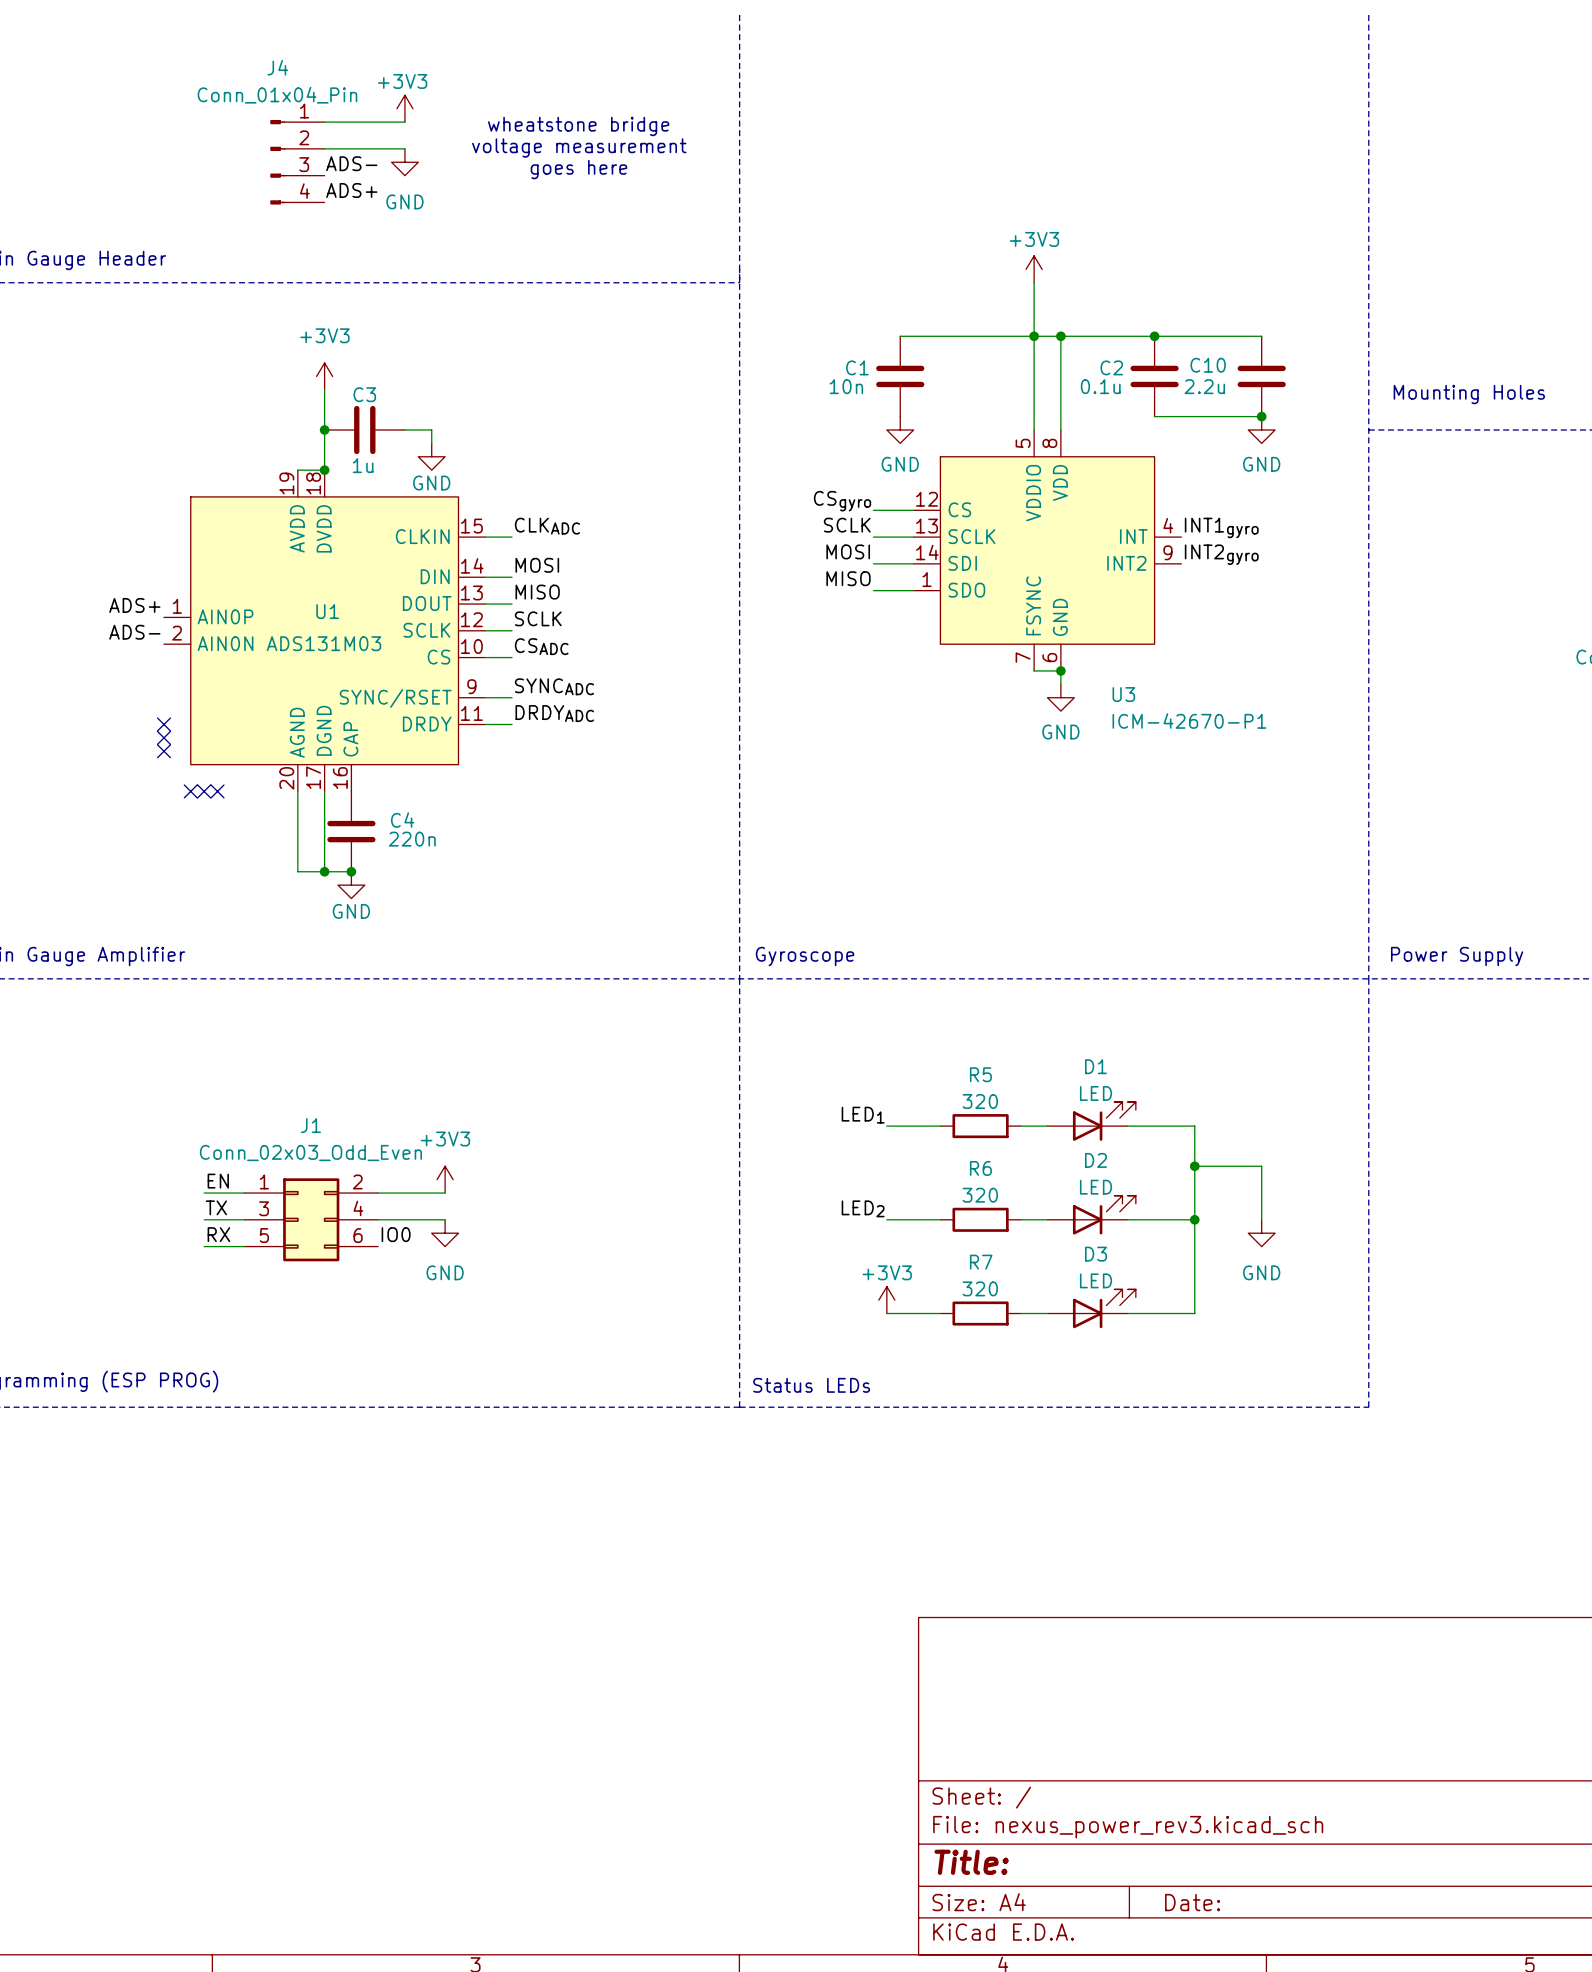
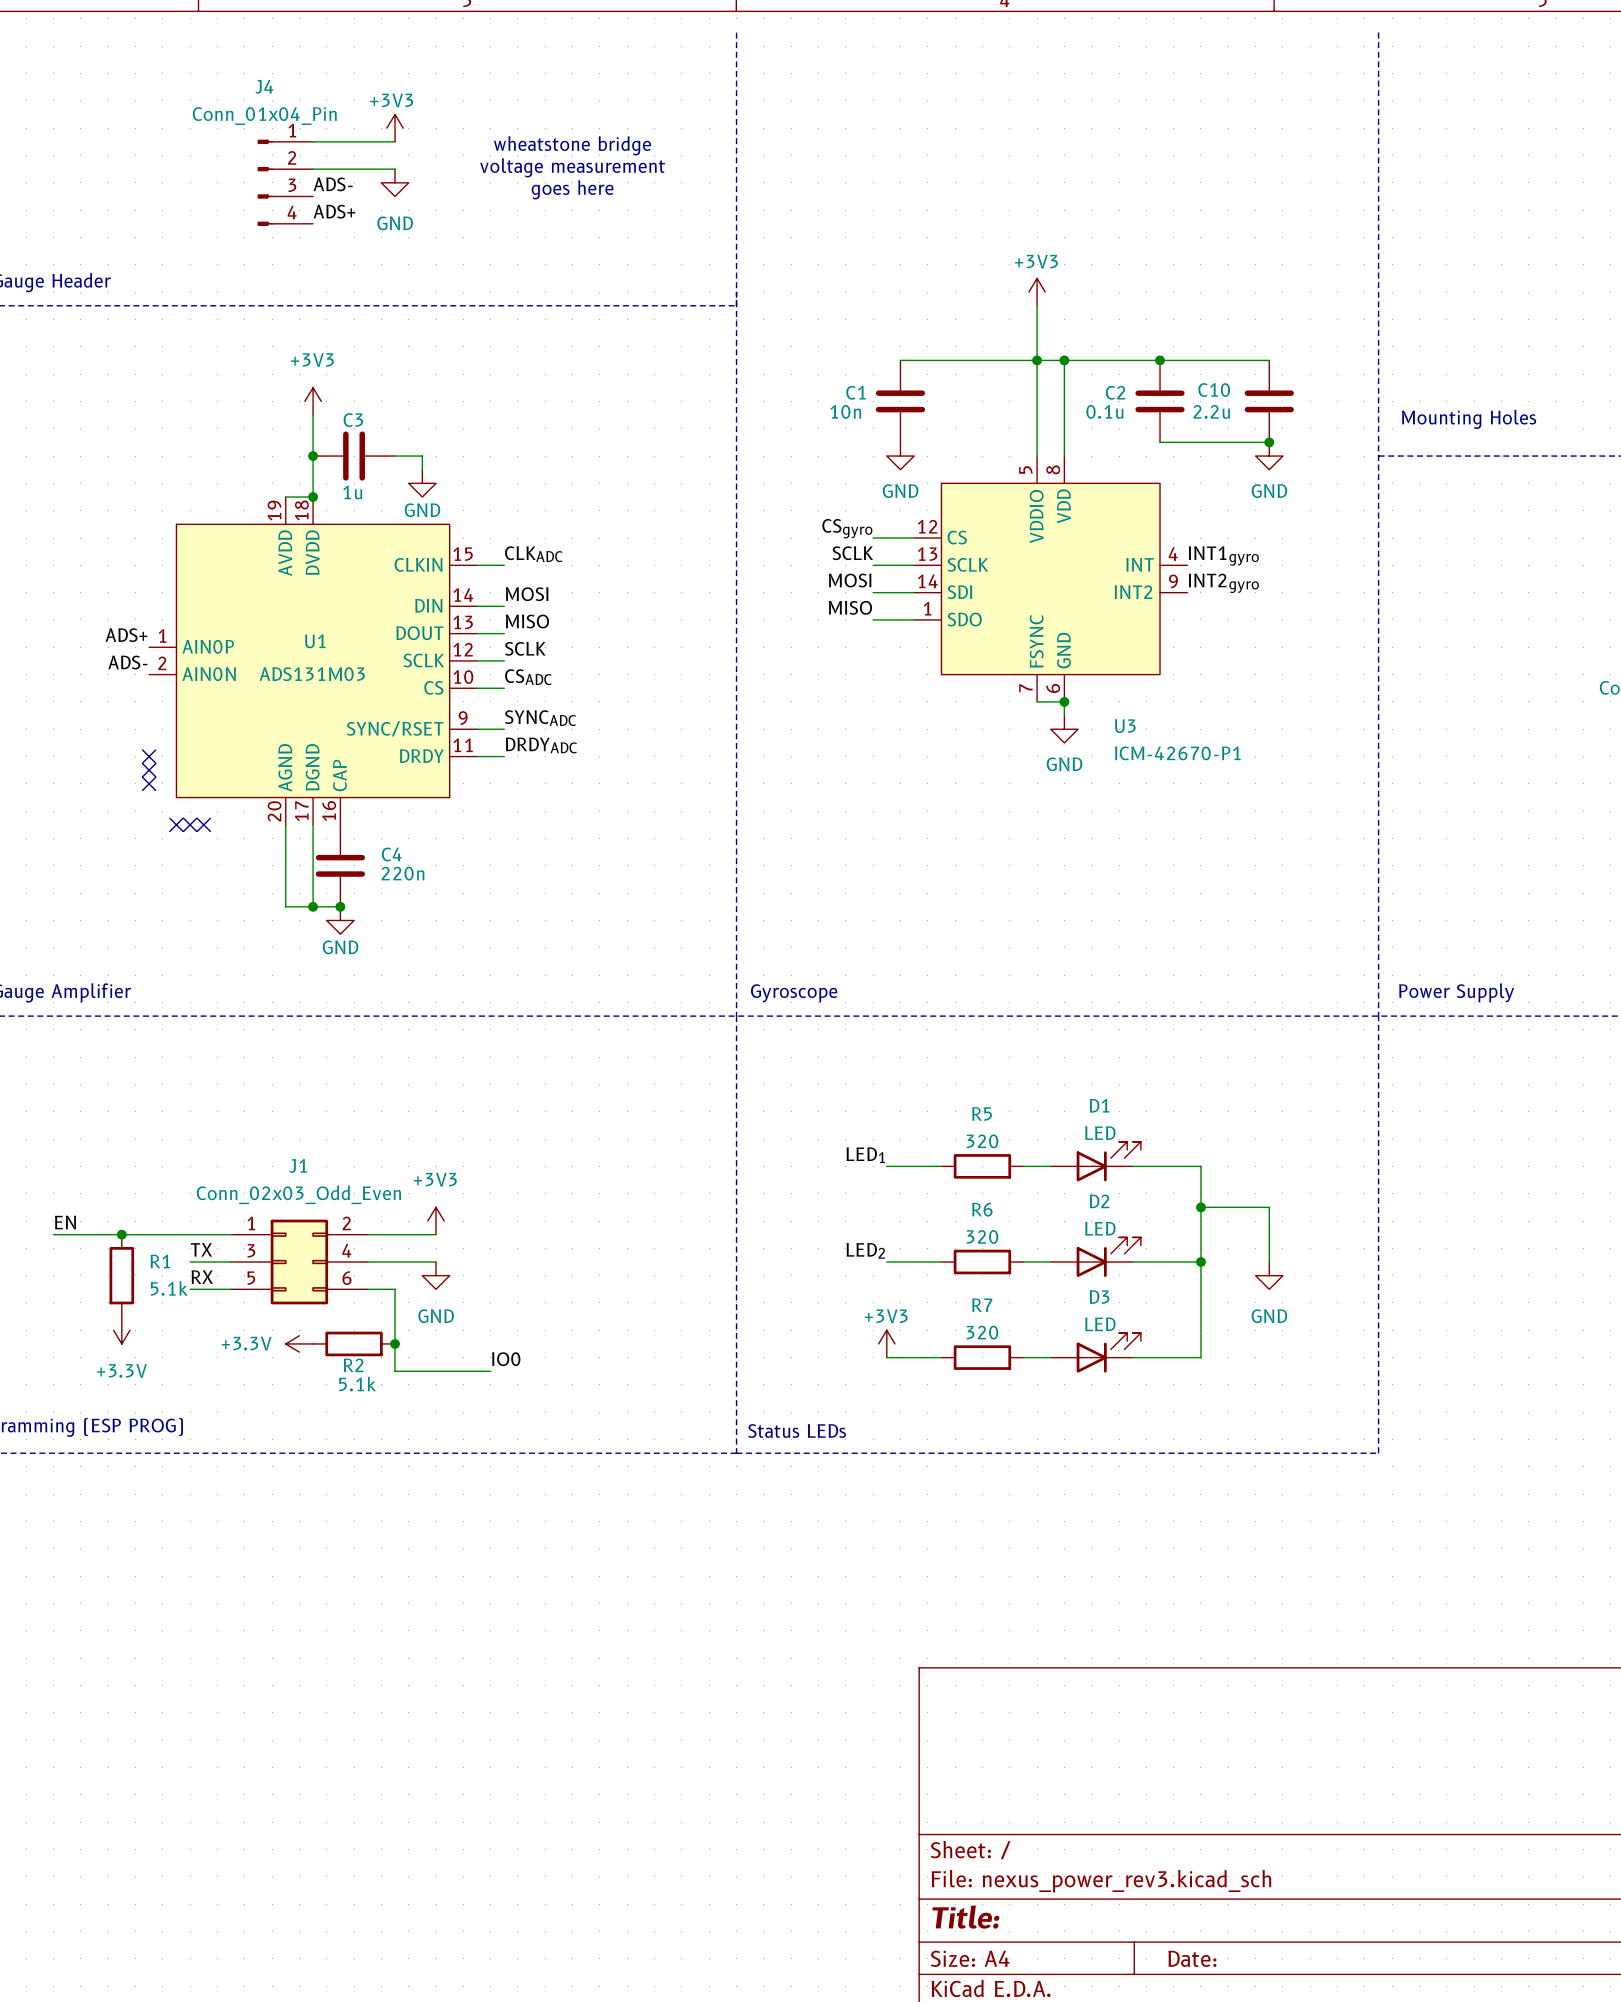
label position: EN (218, 1181) -> EN (65, 1222)
wire: none -> (53, 1234) (190, 1234)
junction: none -> (121, 1234)
R1: none -> 5.1k (121, 1275)
label position: IO0 (396, 1234) -> IO0 (506, 1359)
wire: none -> (367, 1289) (395, 1289) (395, 1371) (490, 1371)
power symbol: none -> +3.3V (121, 1330)
power symbol: none -> +3.3V (299, 1343)
R2: none -> 5.1k (354, 1343)
junction: none -> (395, 1343)

